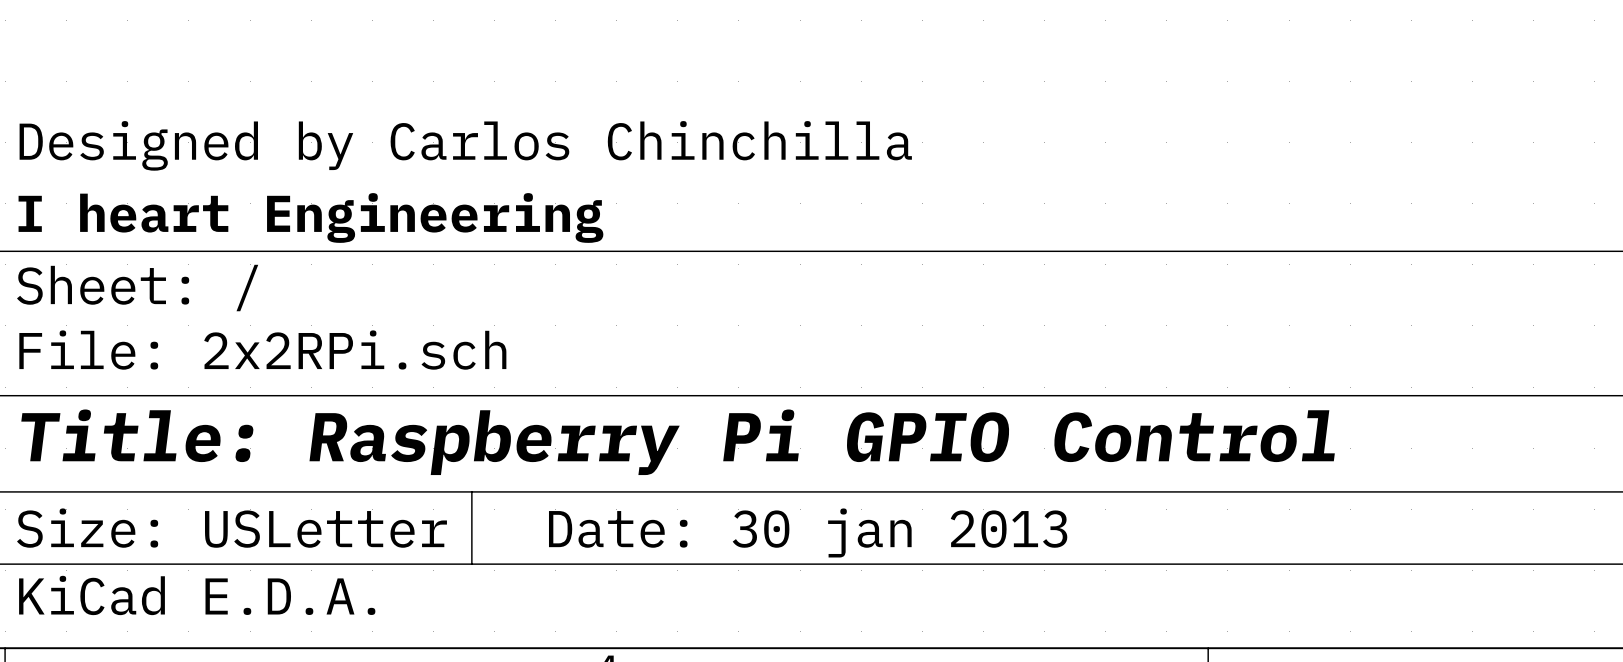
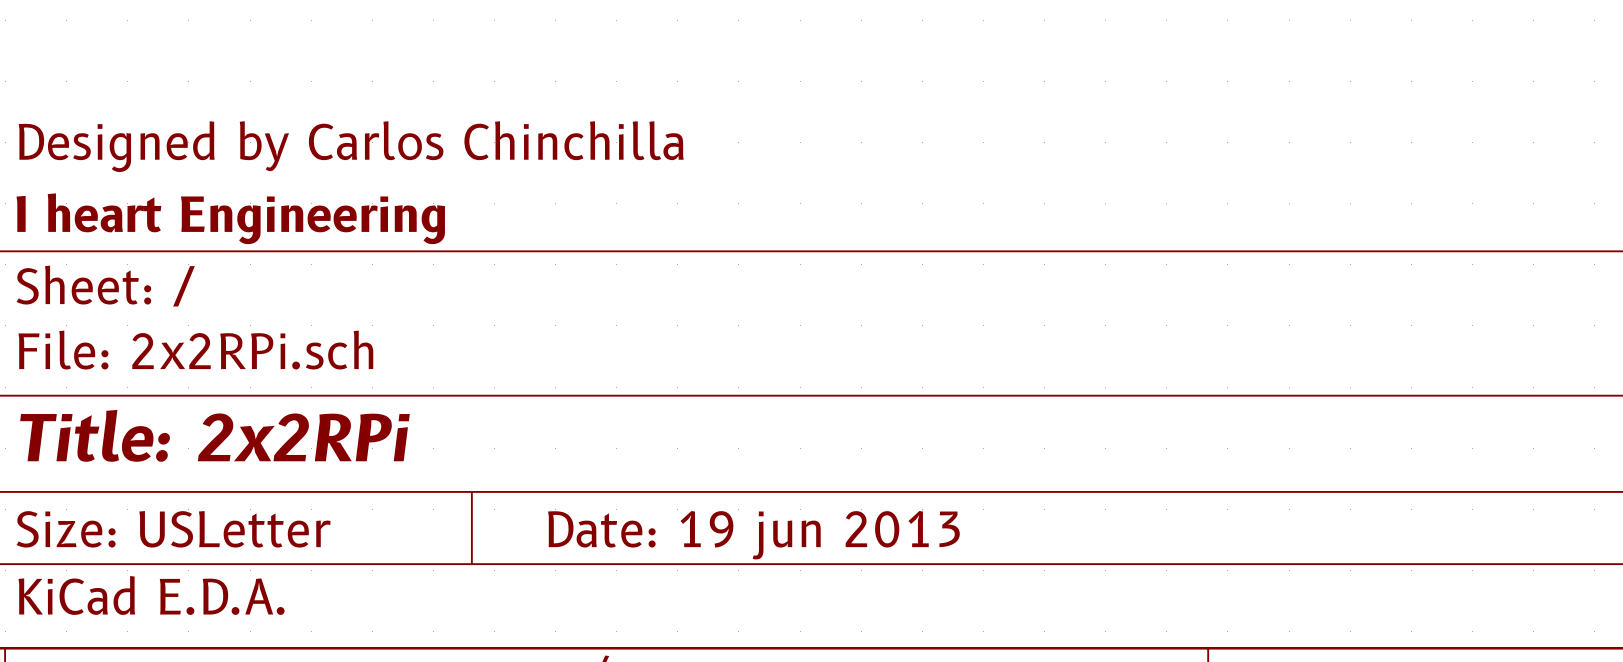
title block: Title: Raspberry Pi GPIO Control (678, 442) -> Title: 2x2RPi (214, 435)
title block: Date: 30 jan 2013 (808, 532) -> Date: 19 jun 2013 (753, 535)

